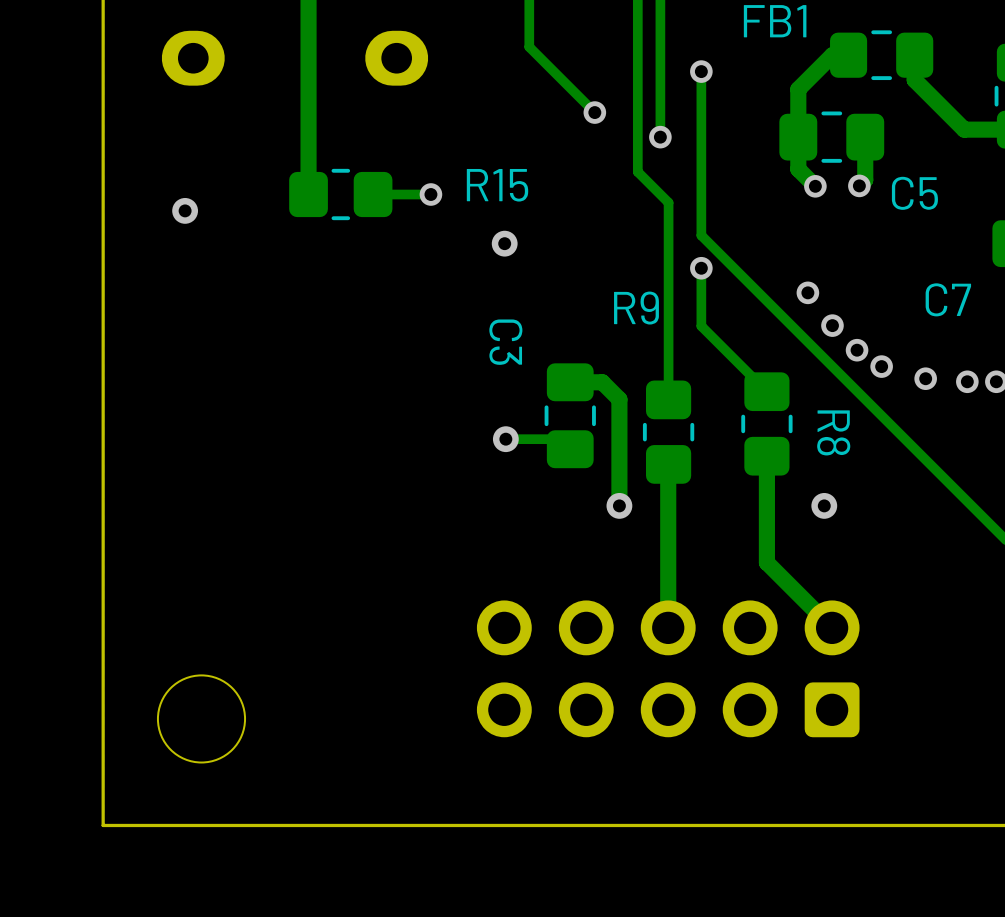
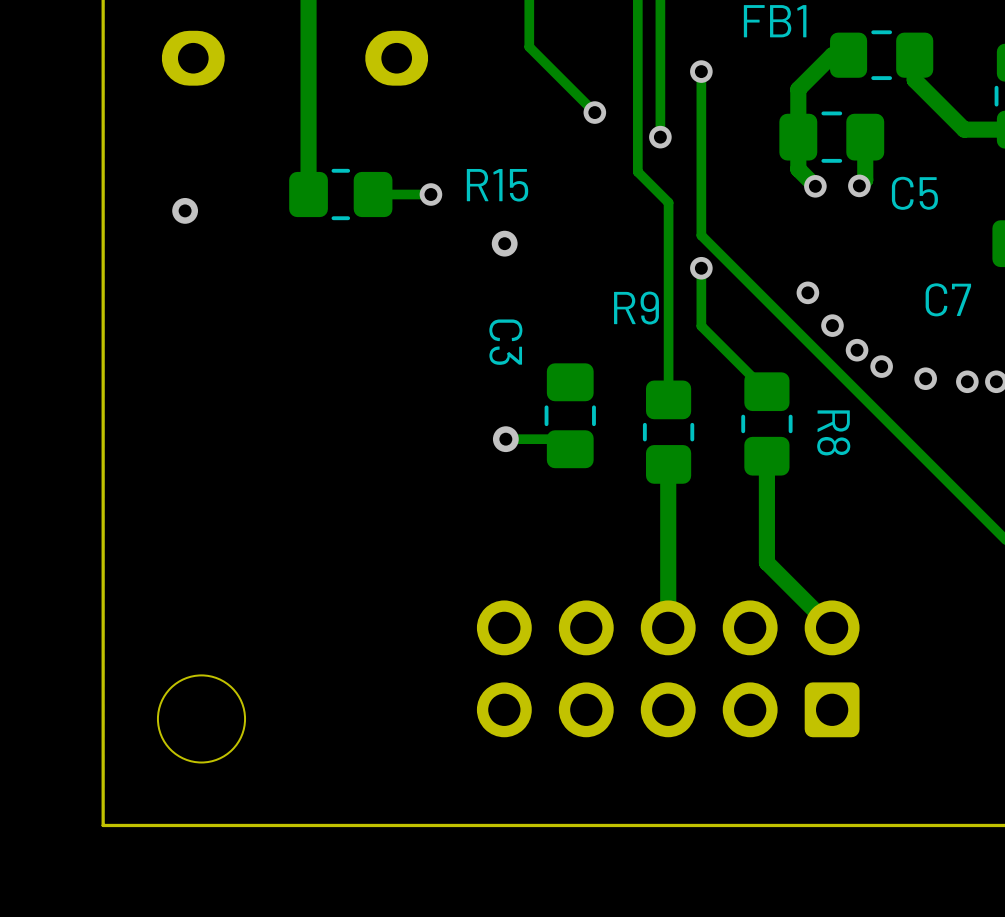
track: (570, 382) (602, 382) (619, 399) (619, 505) -> none
via: (619, 505) -> none
via: (824, 505) -> none

